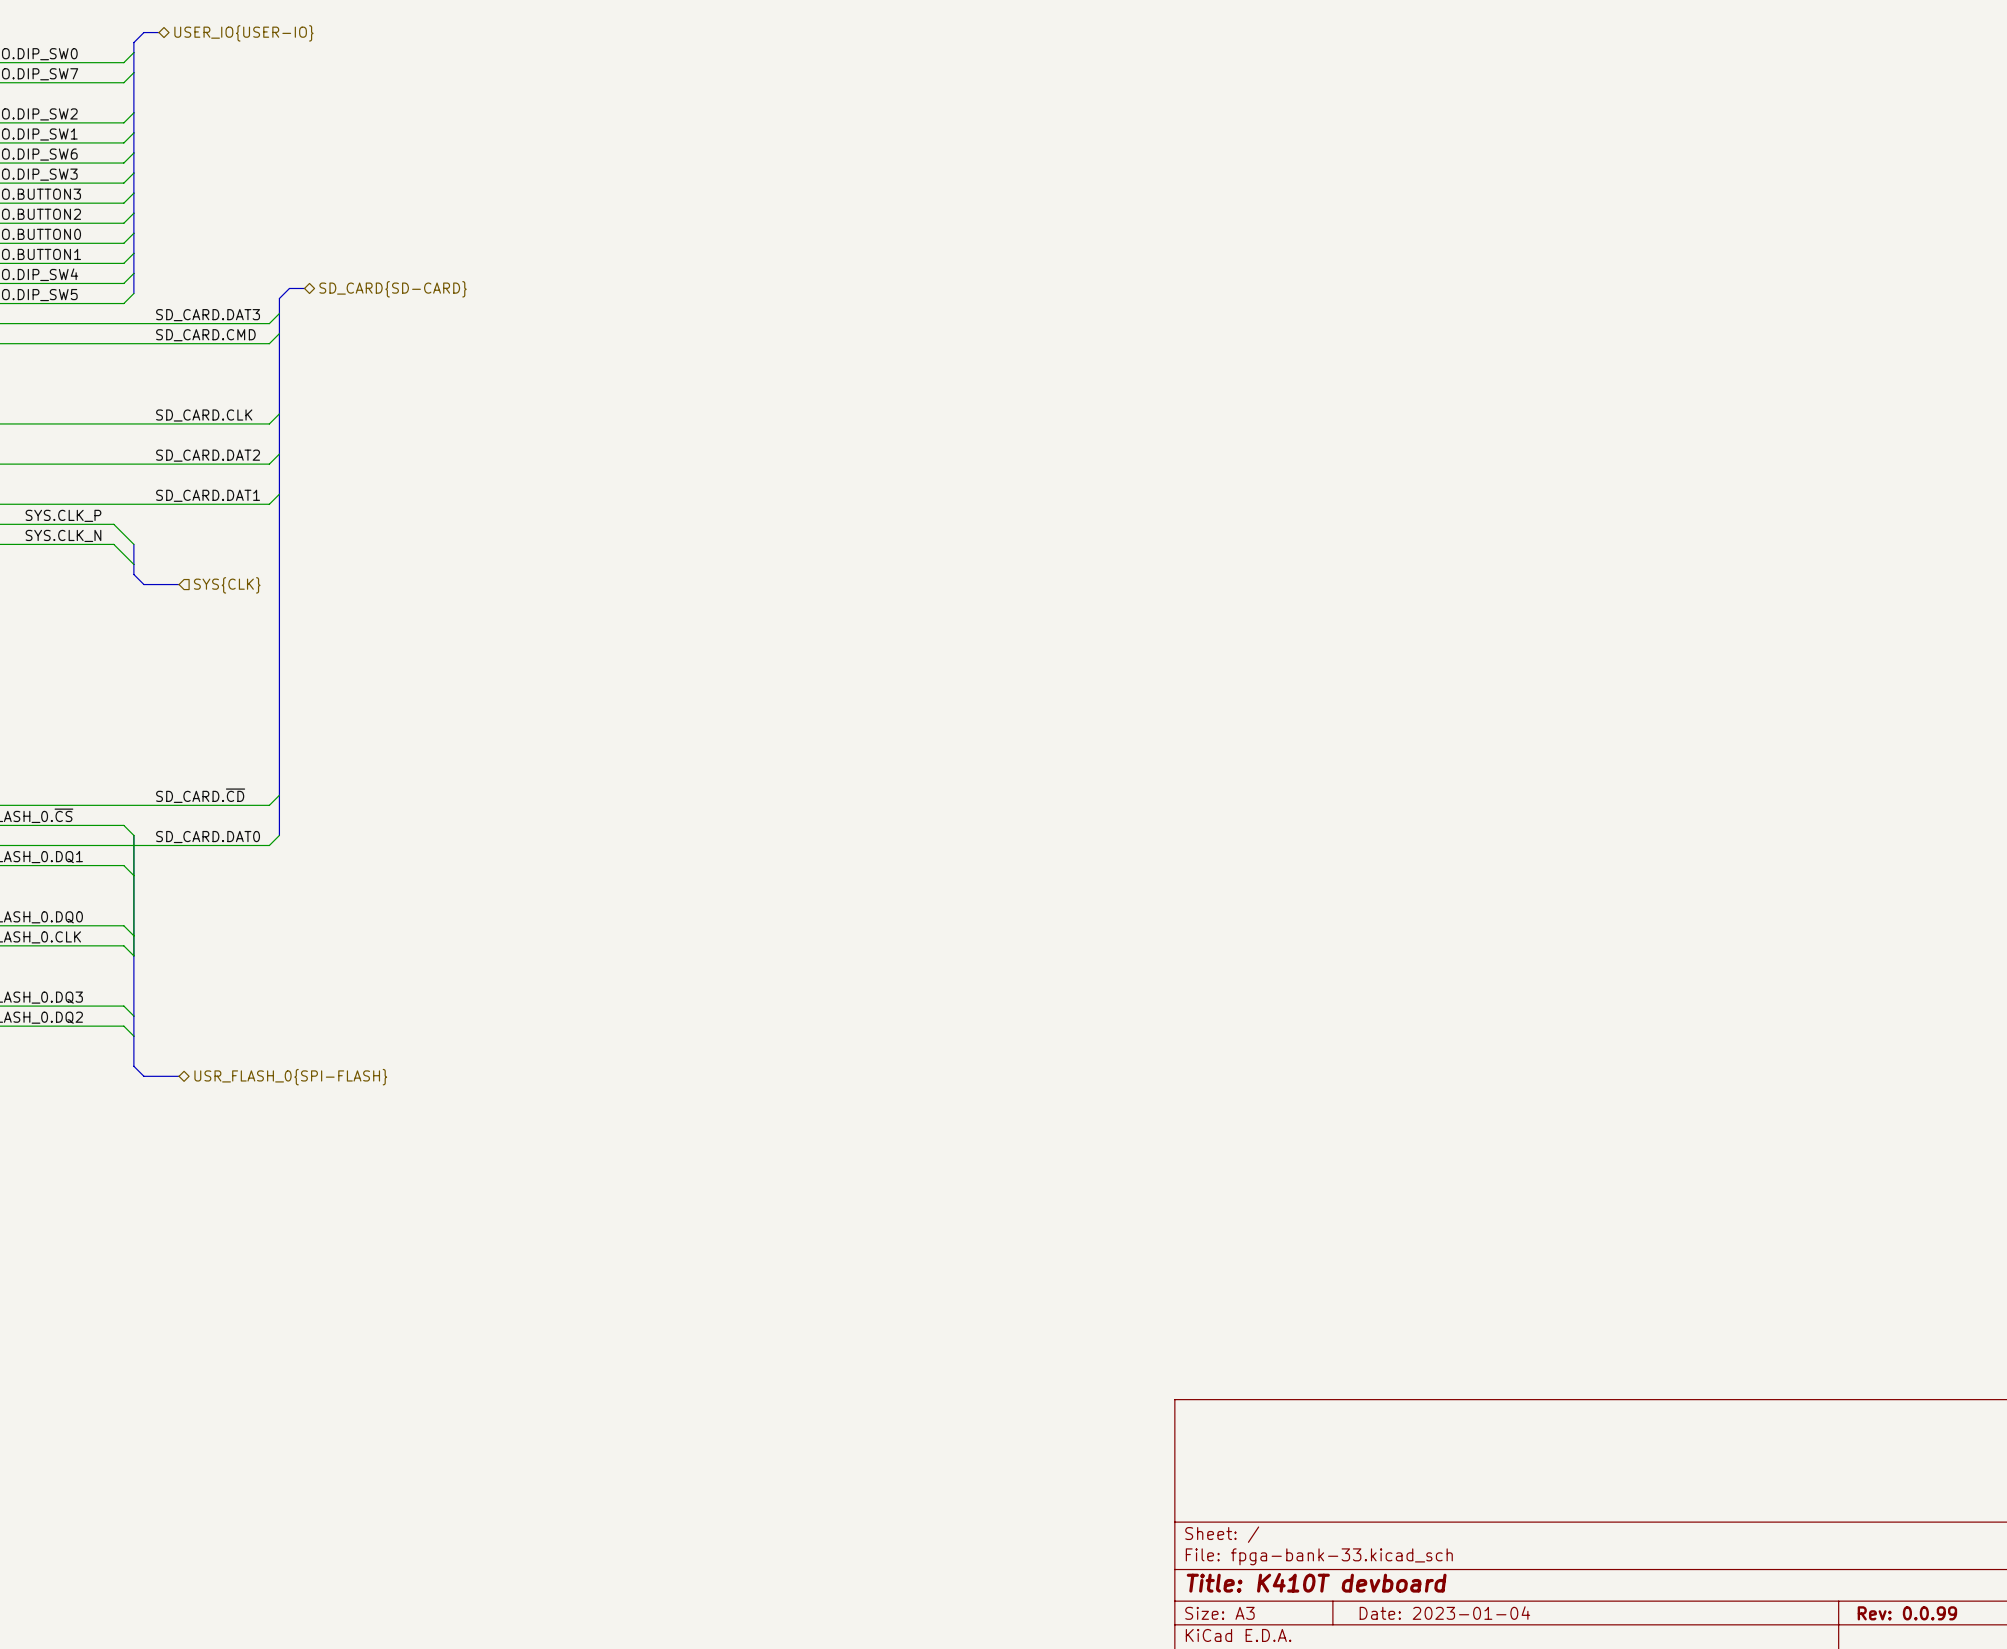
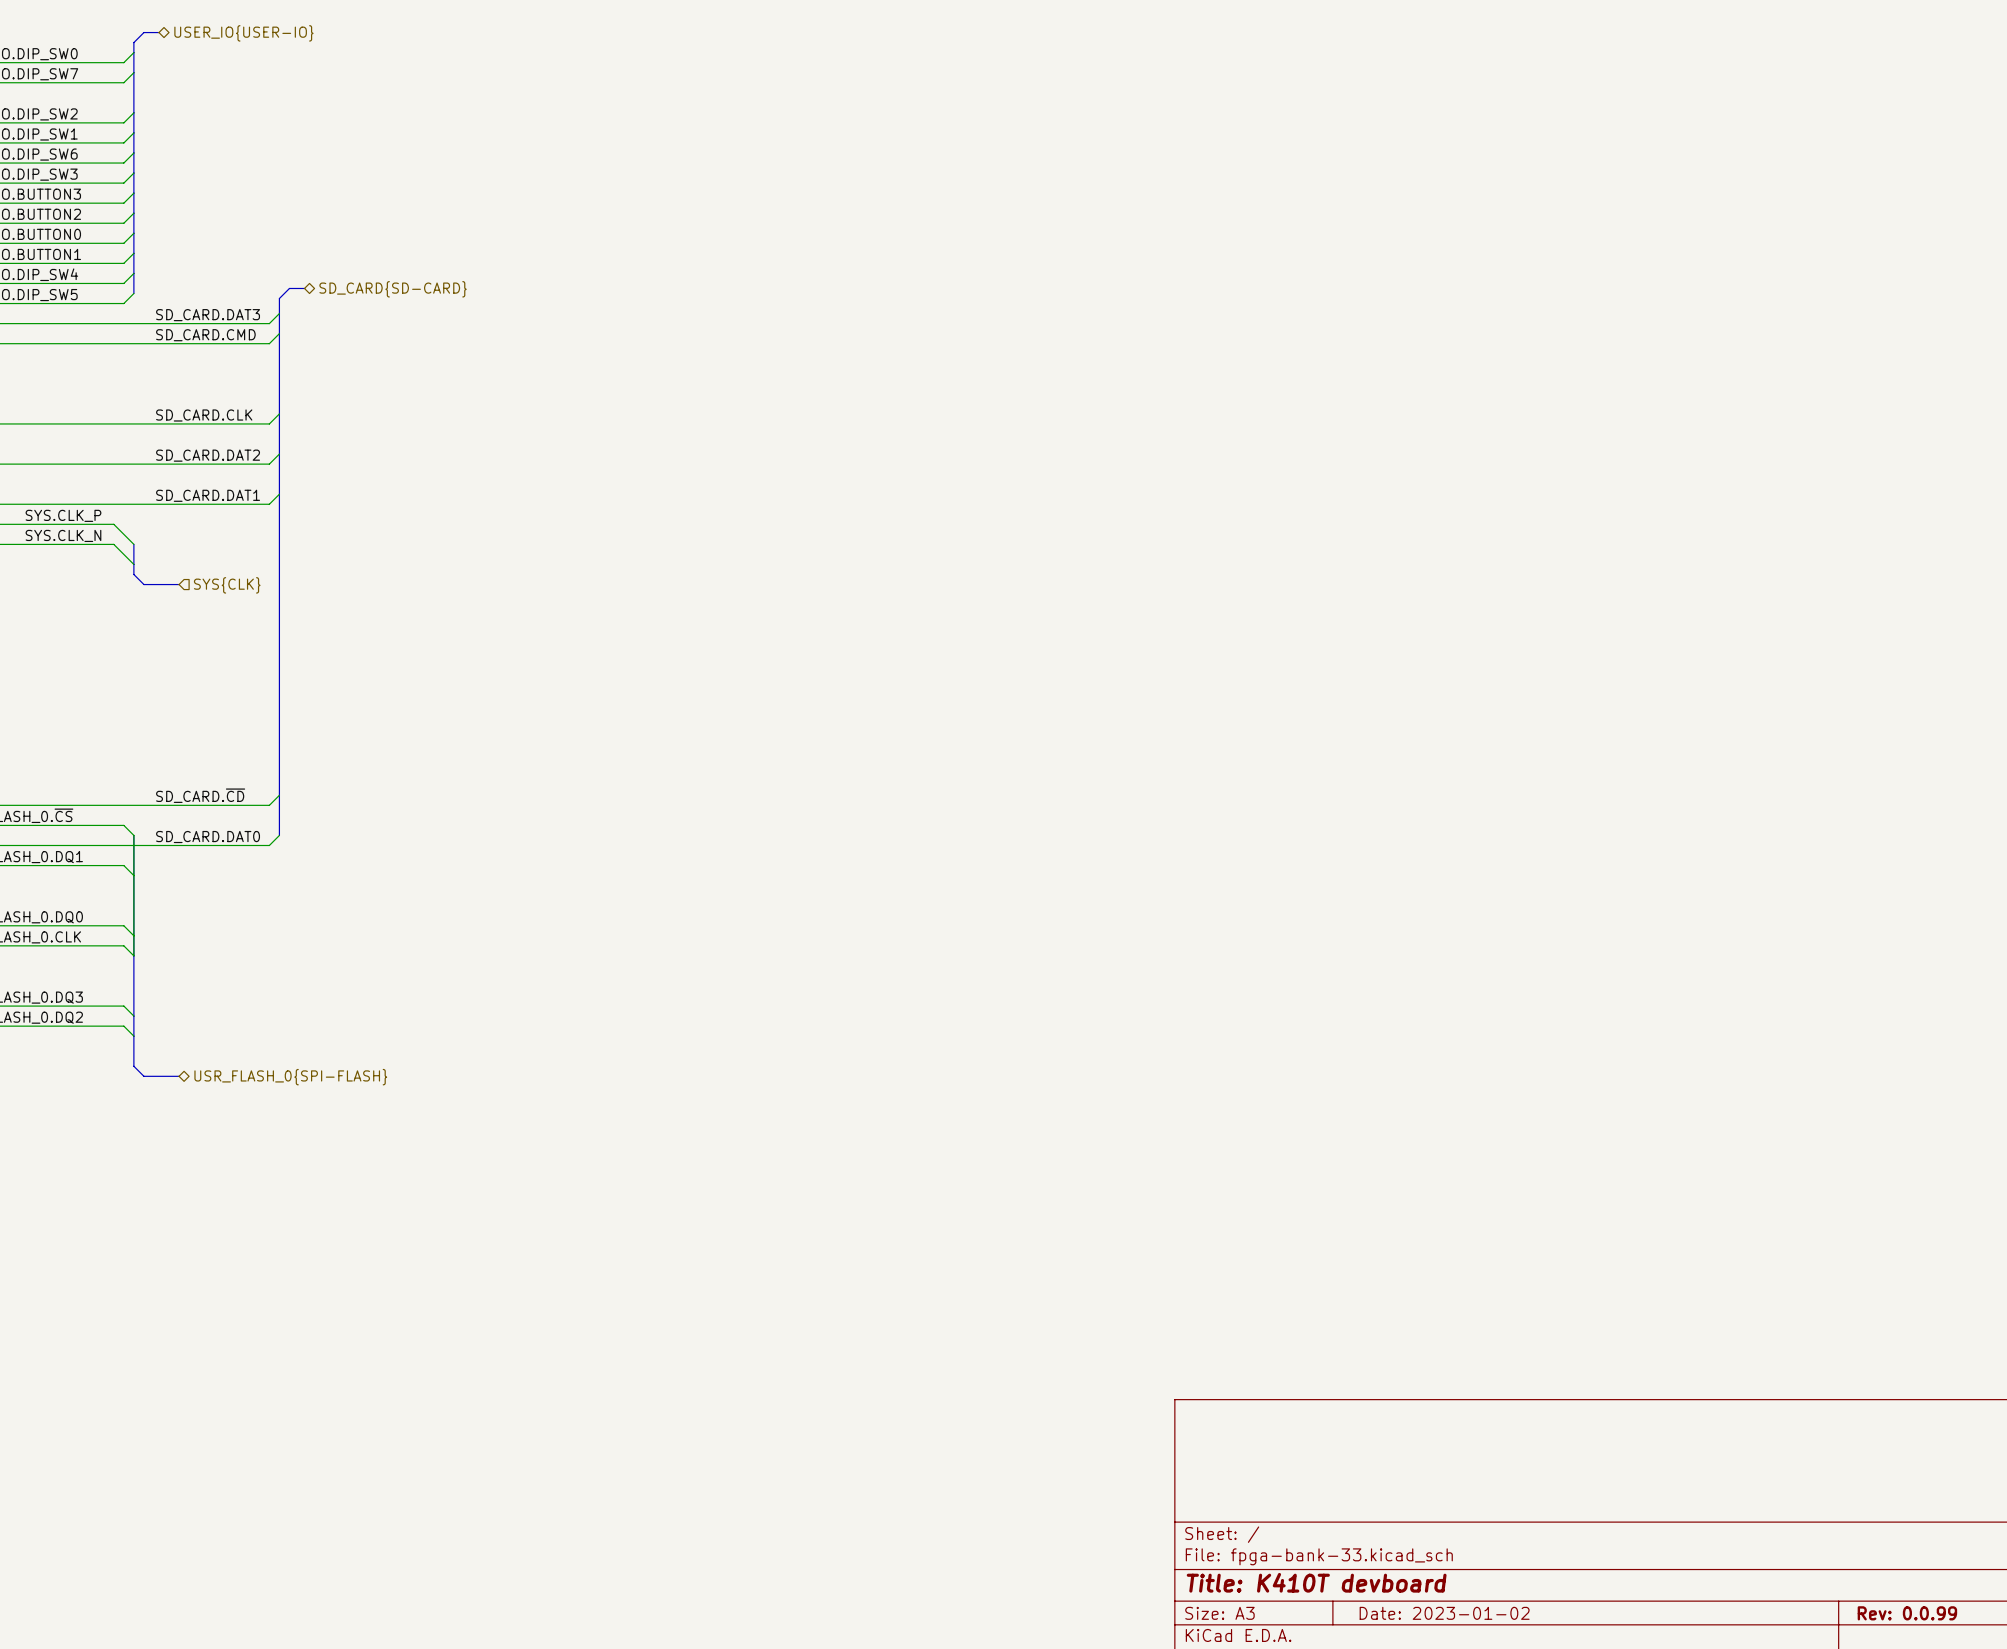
title block: Date: 2023-01-04 (1444, 1613) -> Date: 2023-01-02 (1444, 1613)

